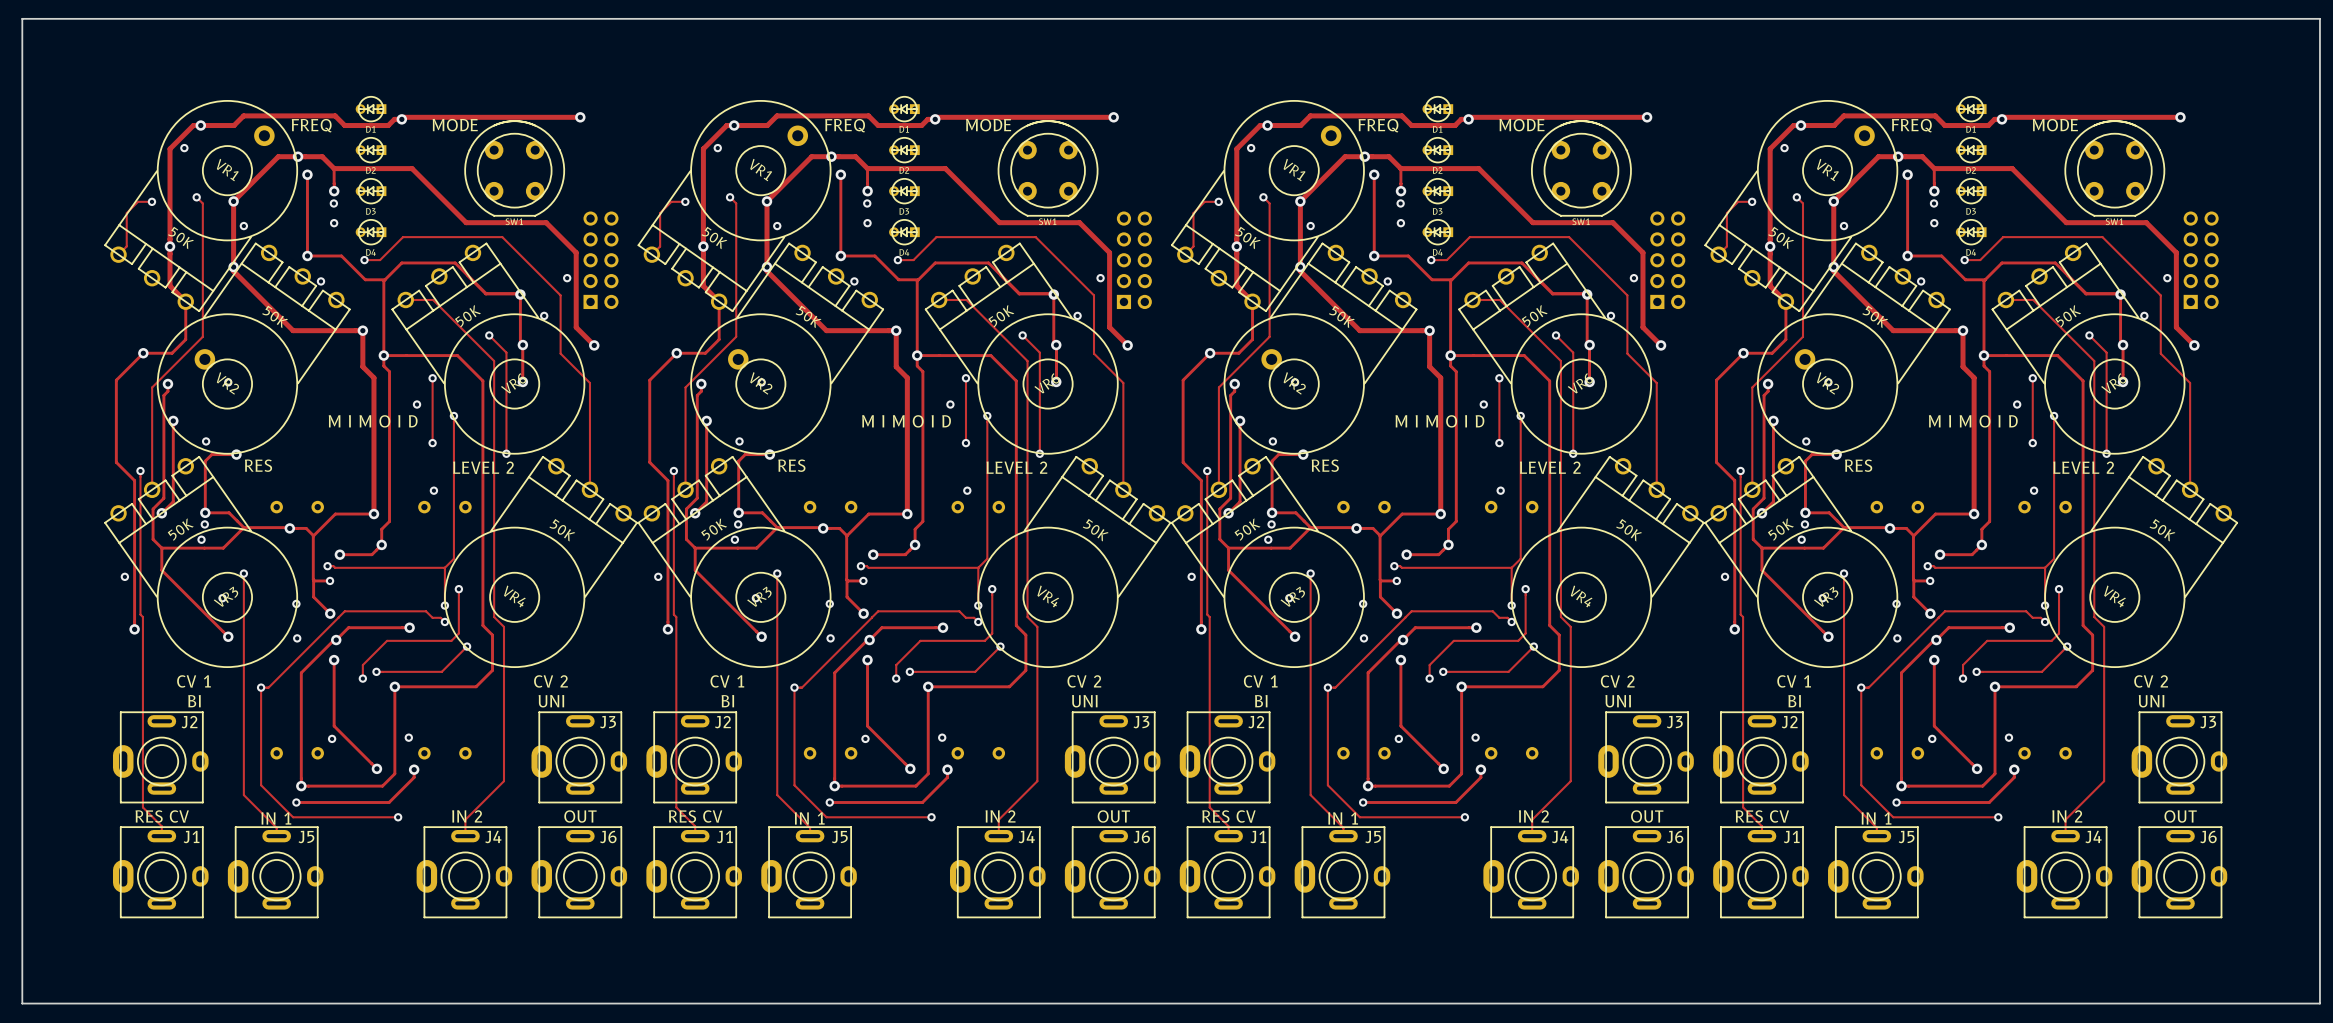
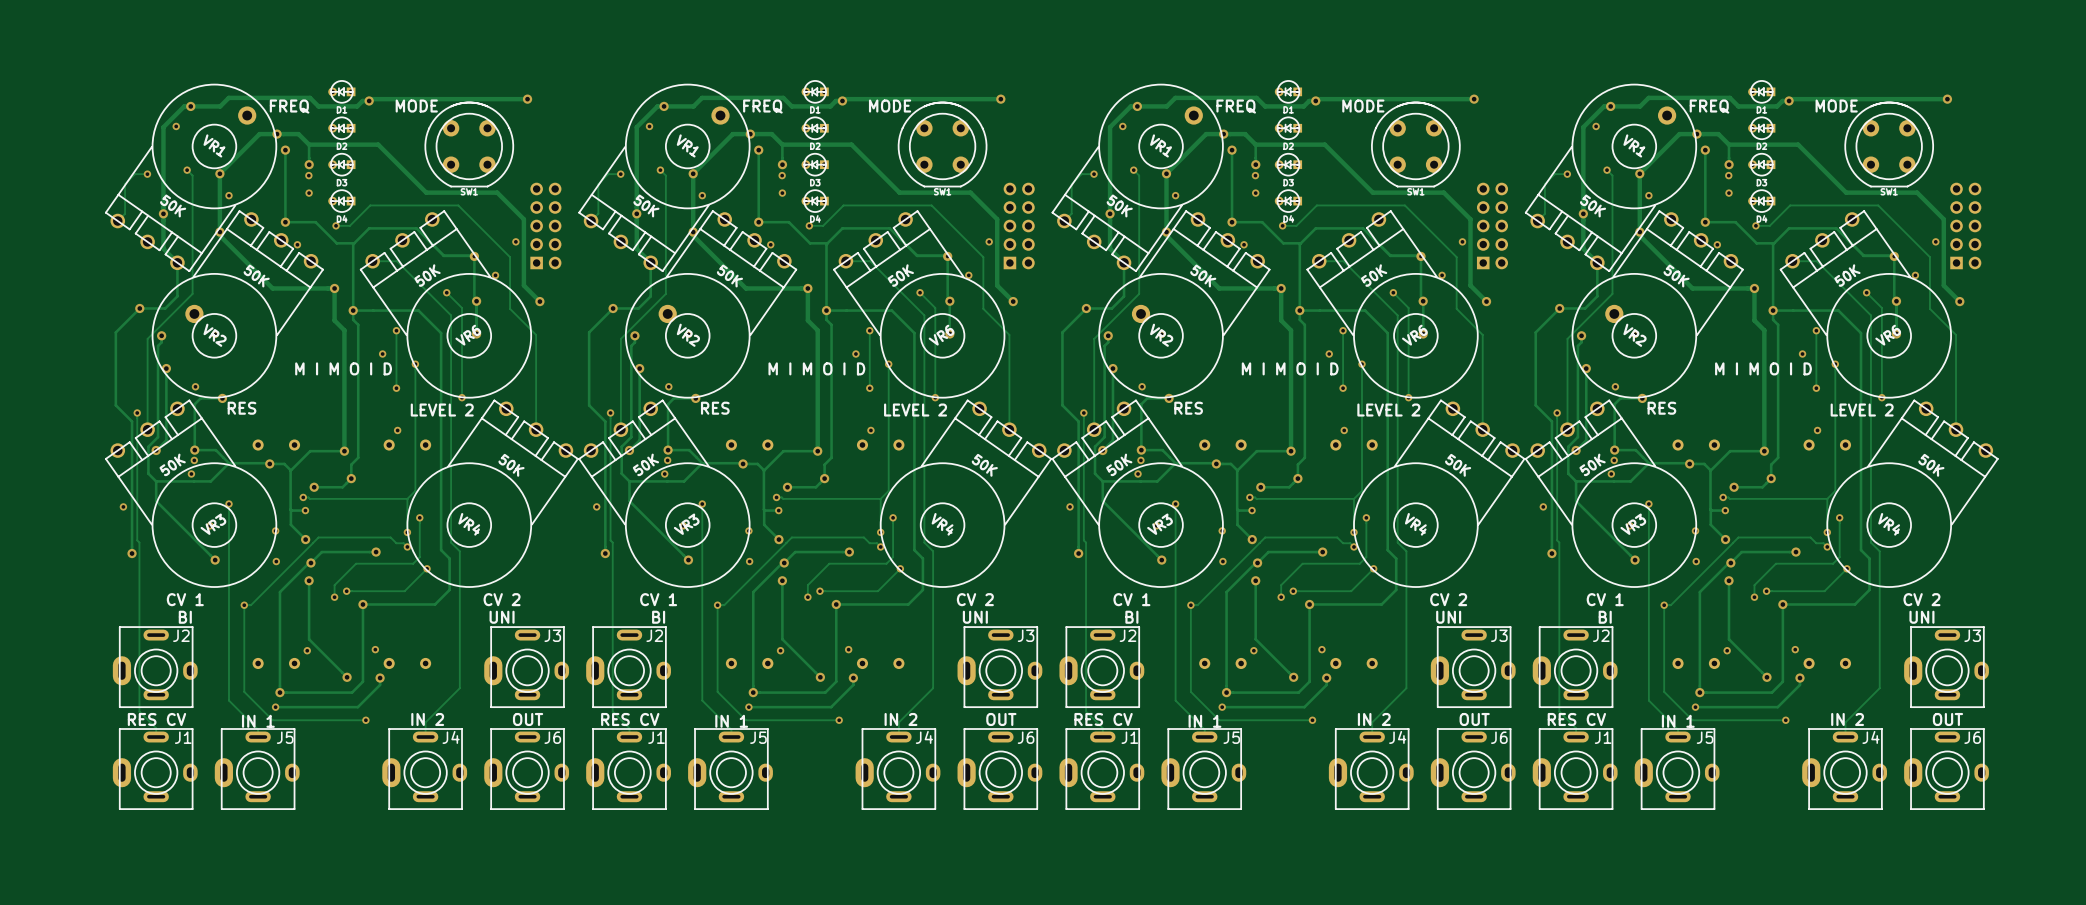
board edge: (22, 18) (2319, 18) (2319, 1003) (22, 1003) (22, 18) -> none

